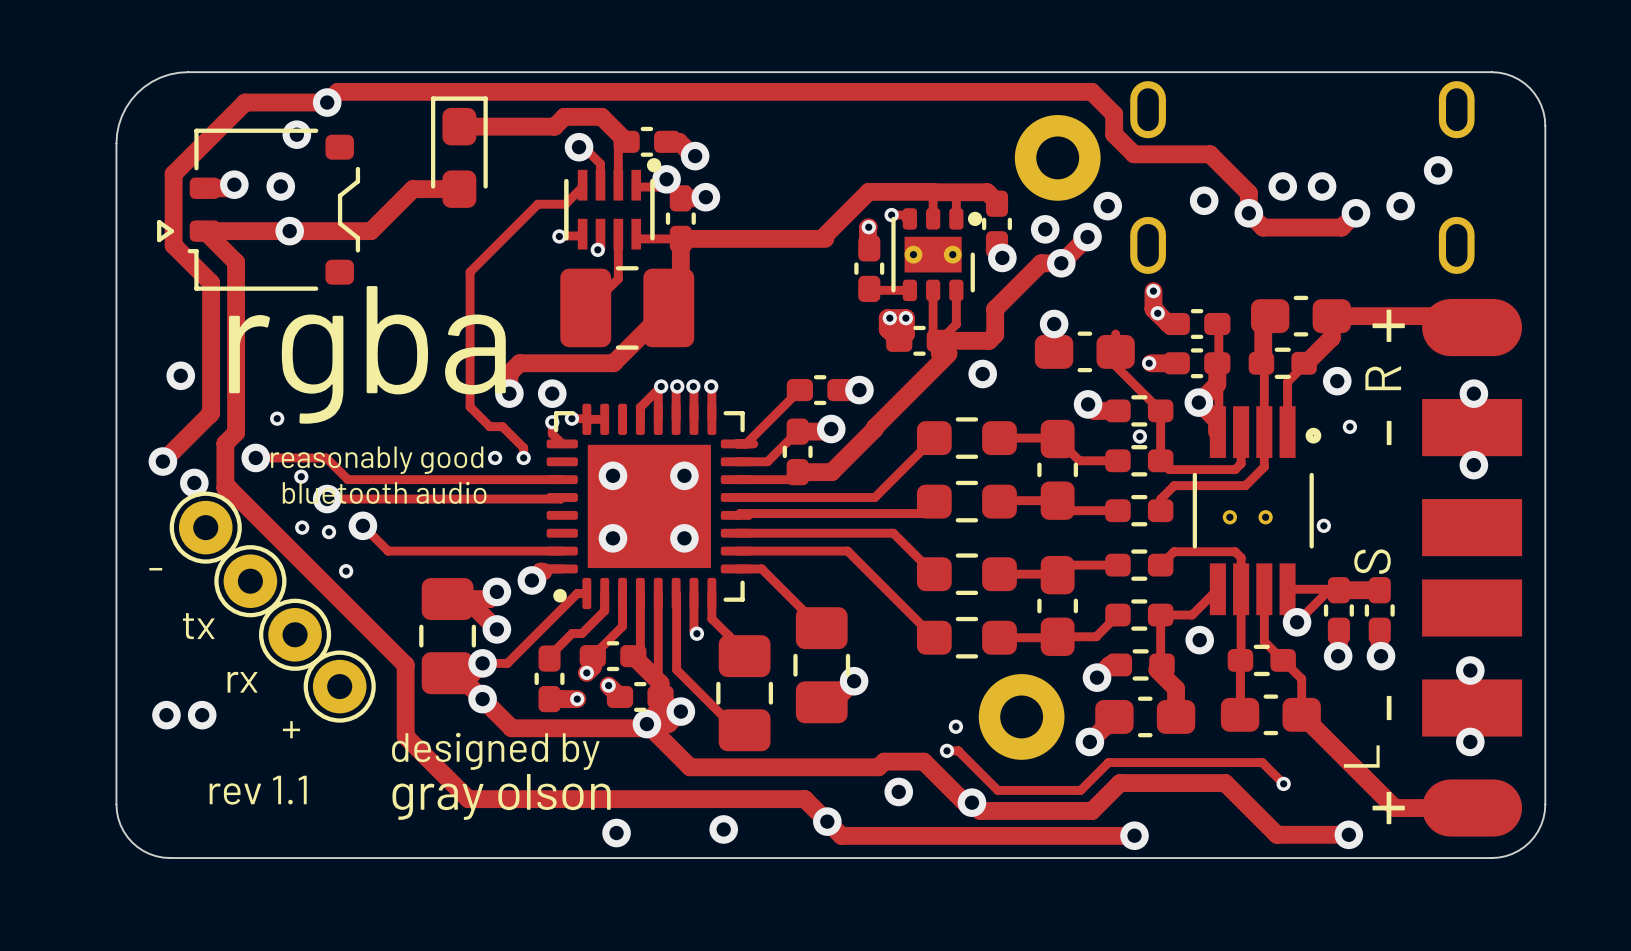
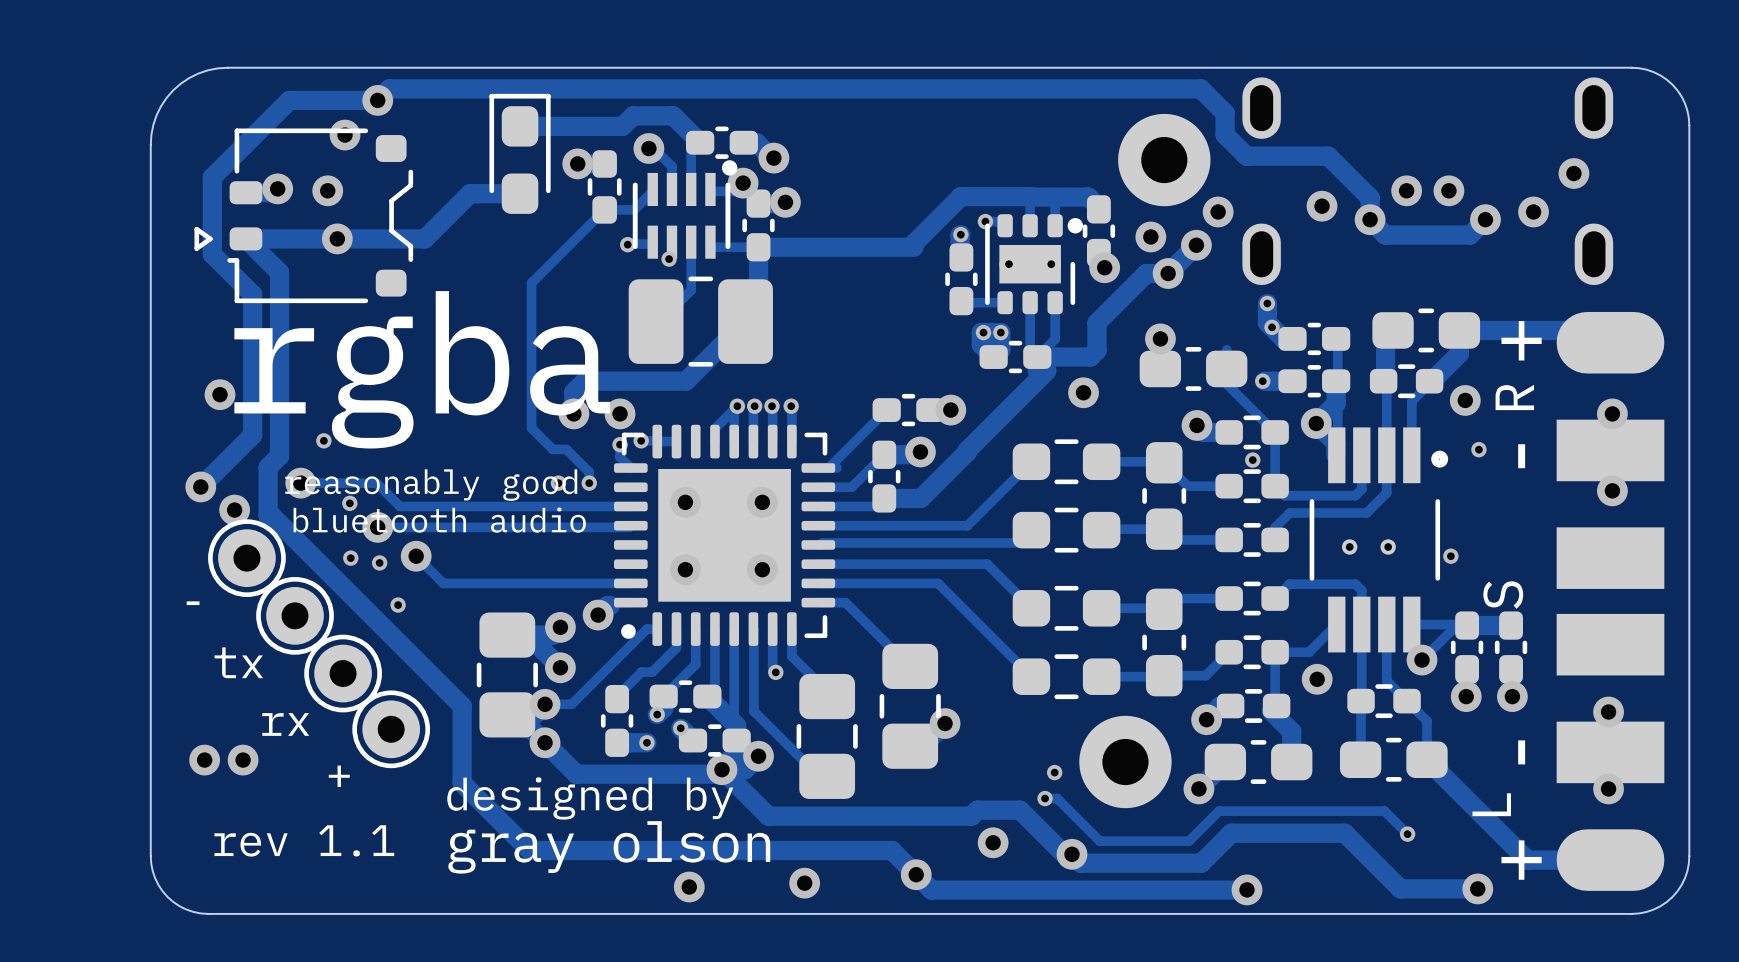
via: none -> (577, 163)
part: none -> (604, 186)

